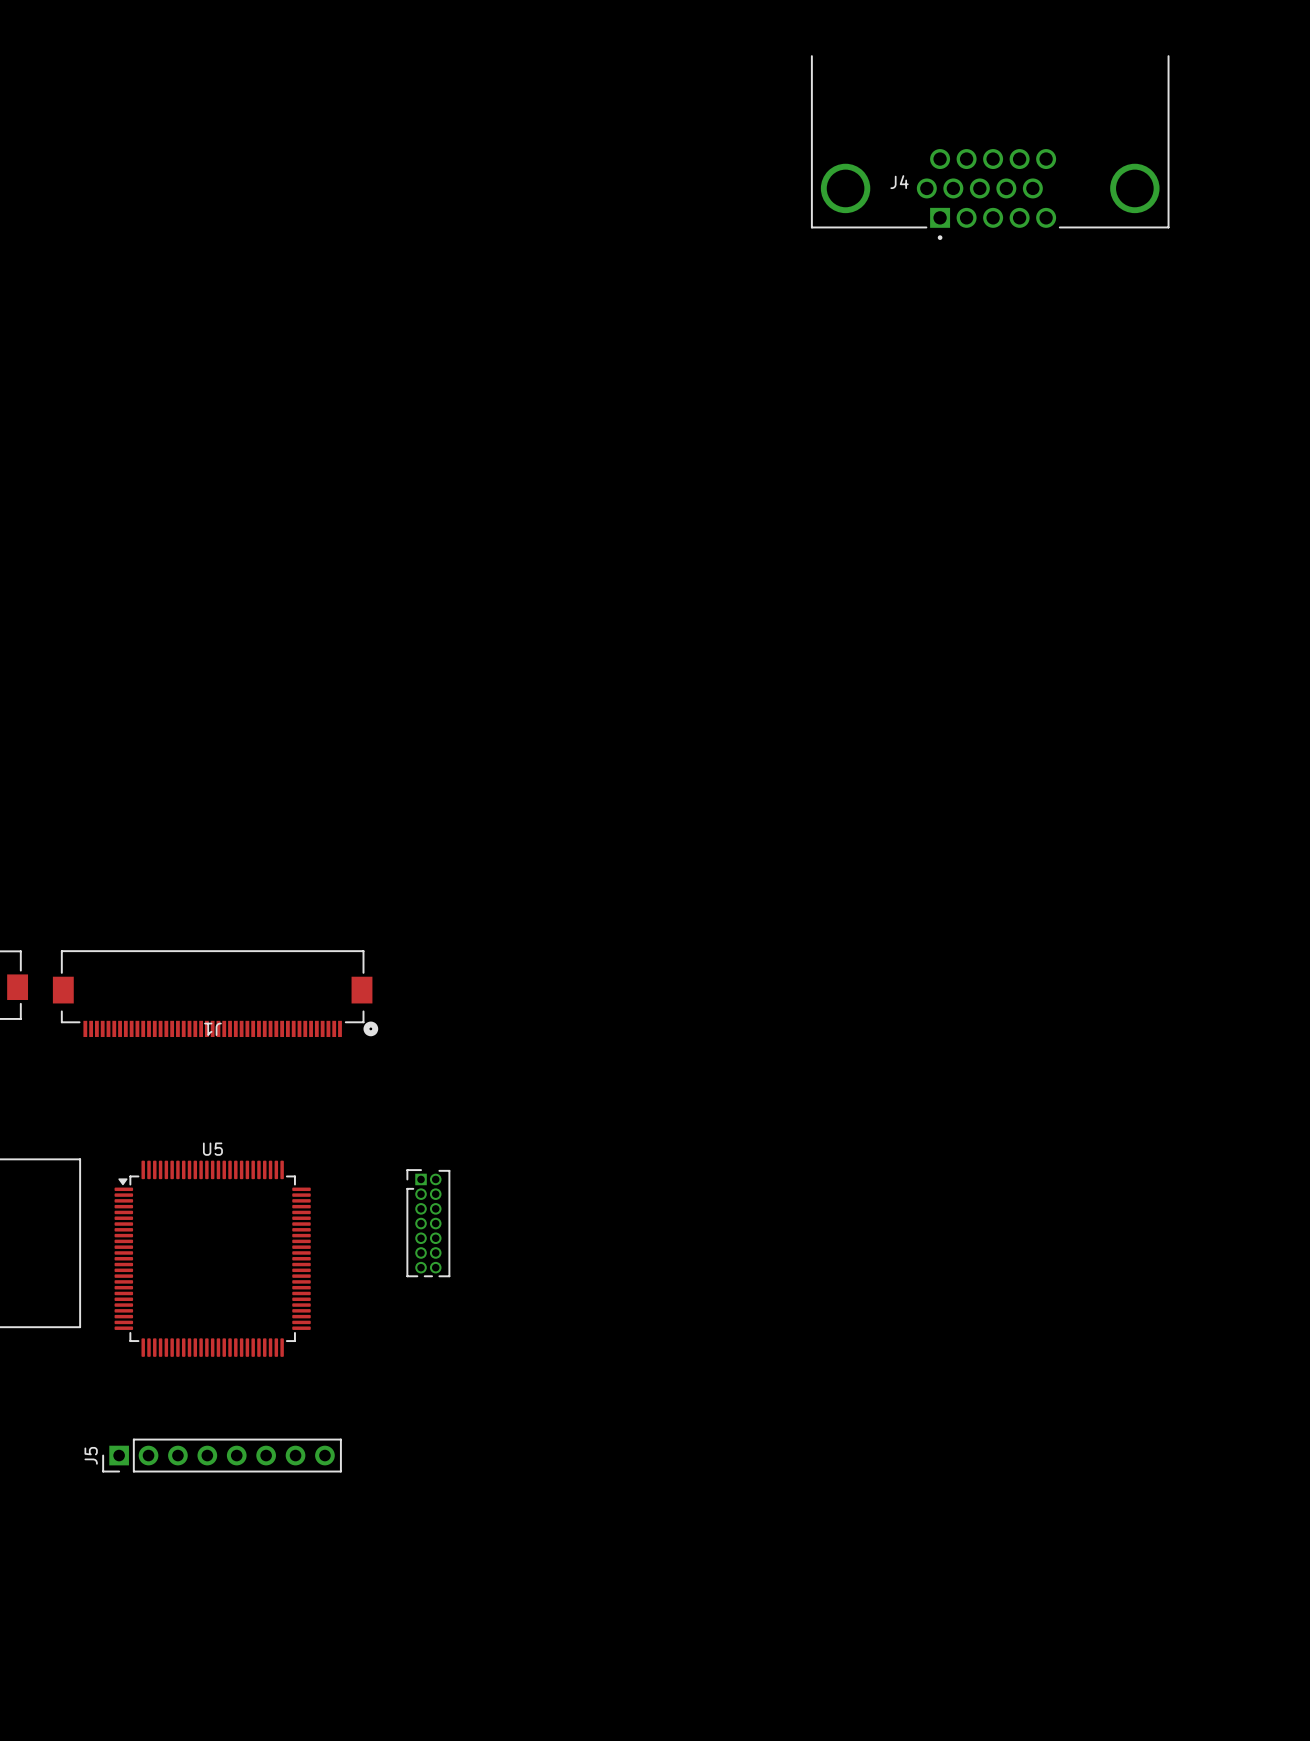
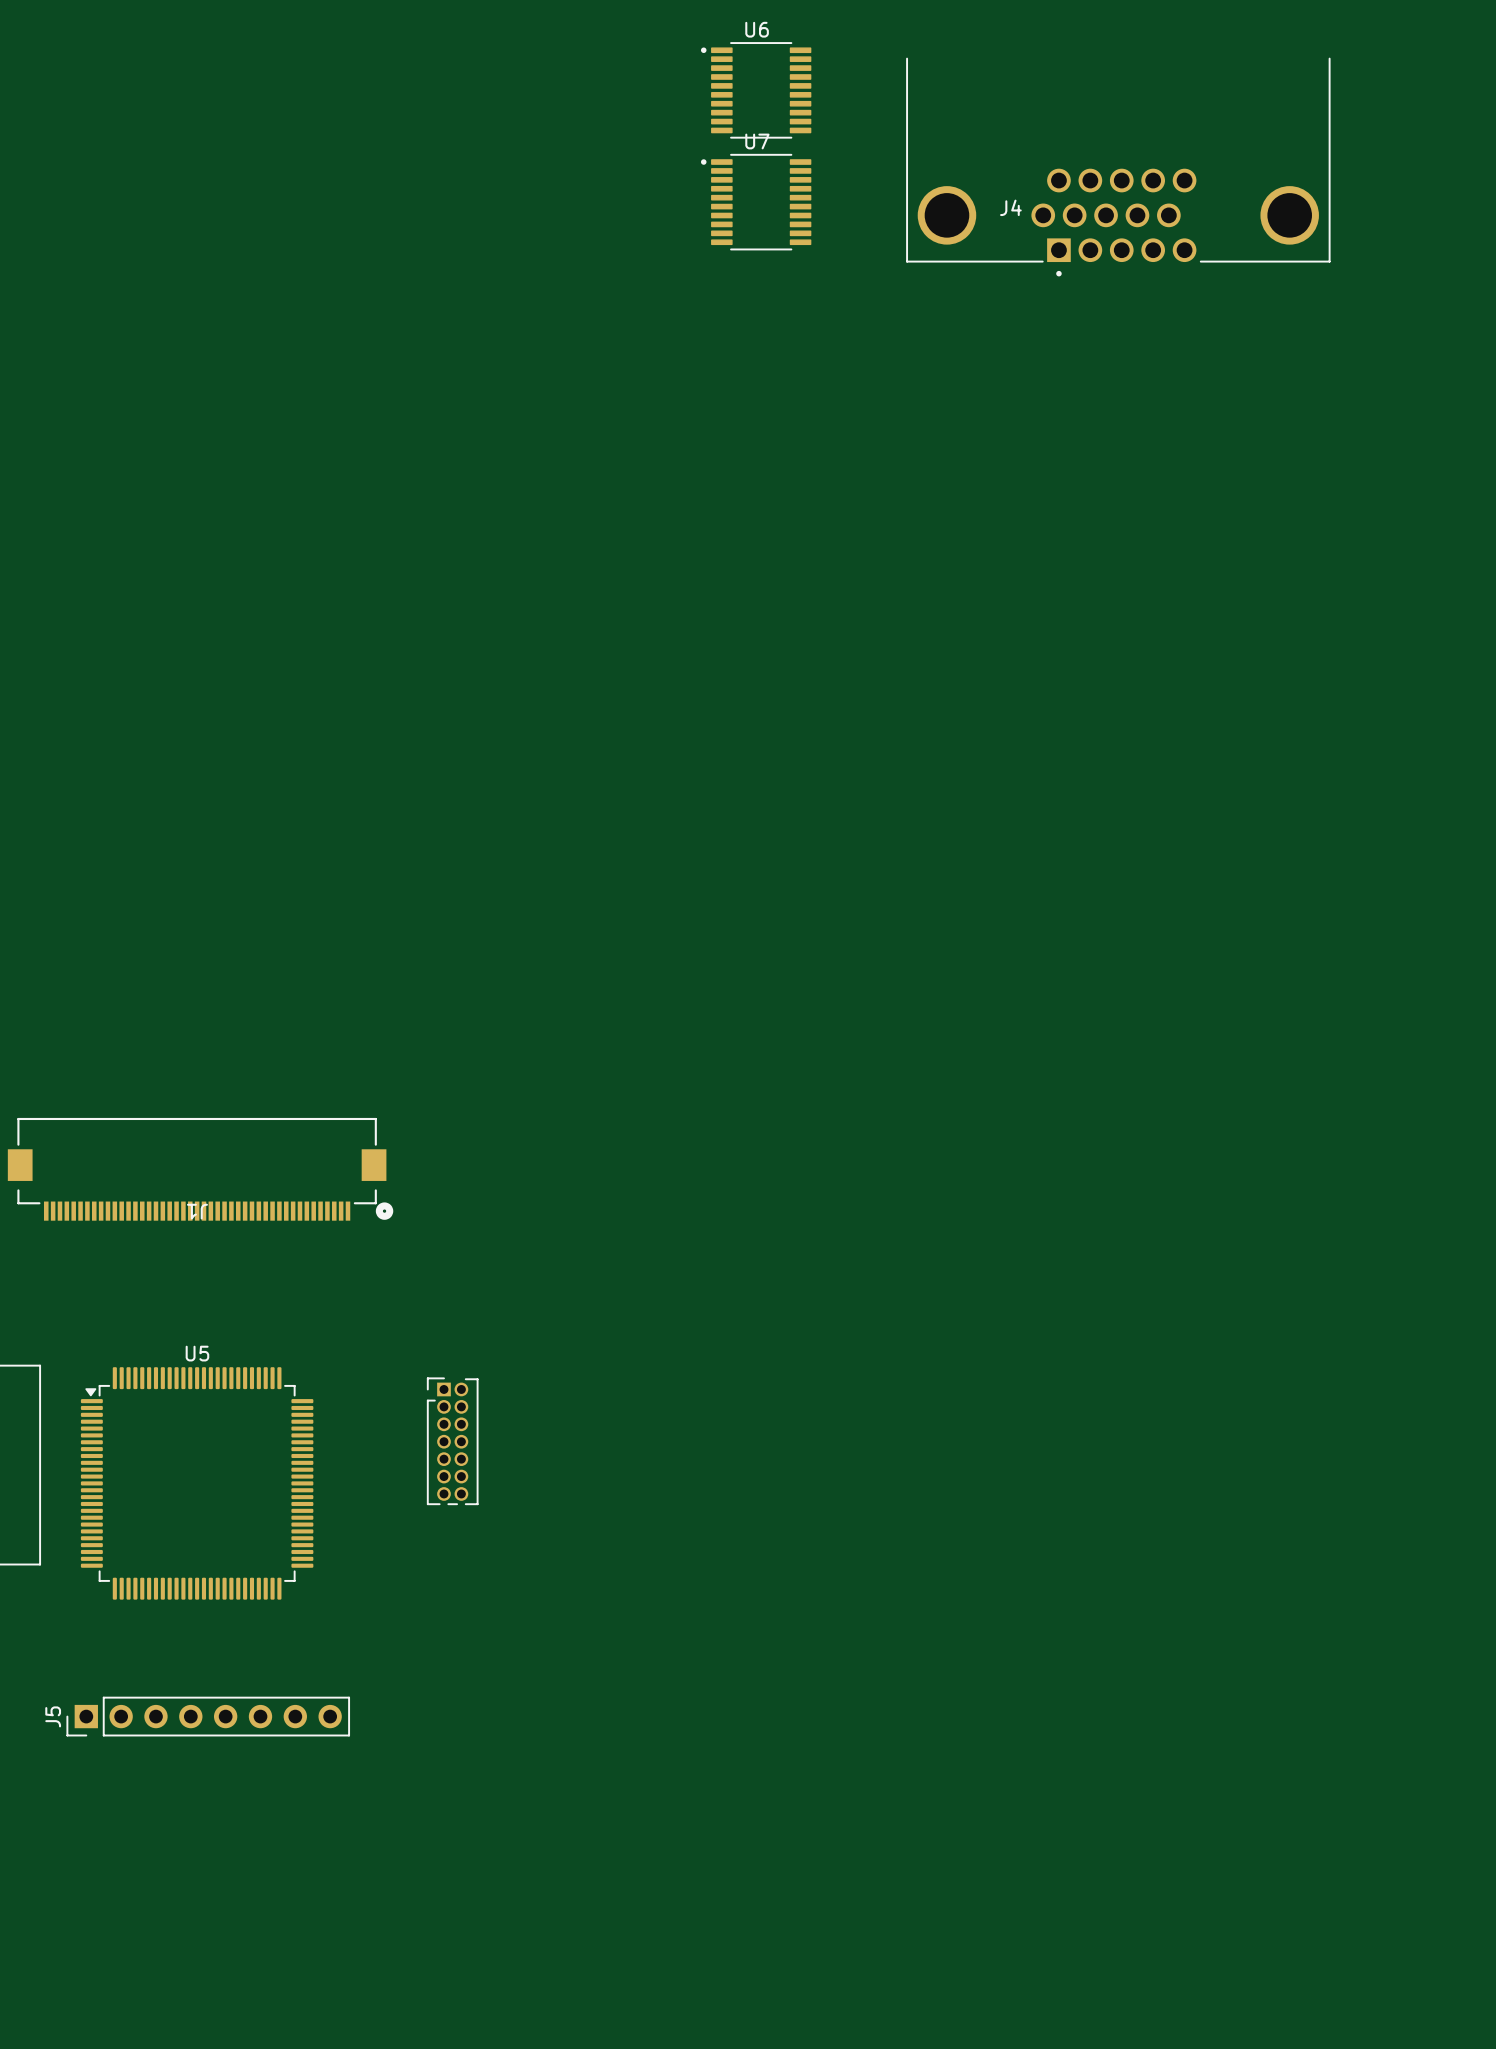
U6: none -> (756, 90)
U7: none -> (756, 202)

